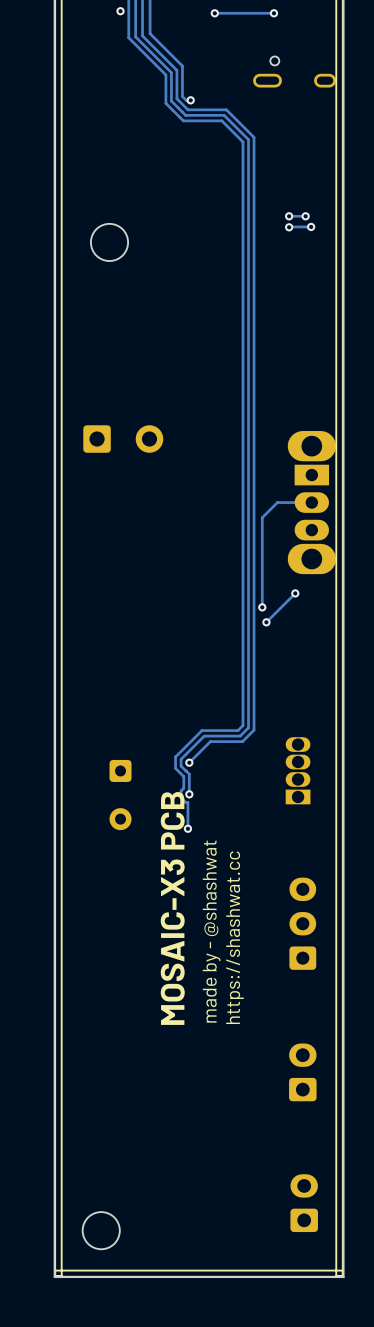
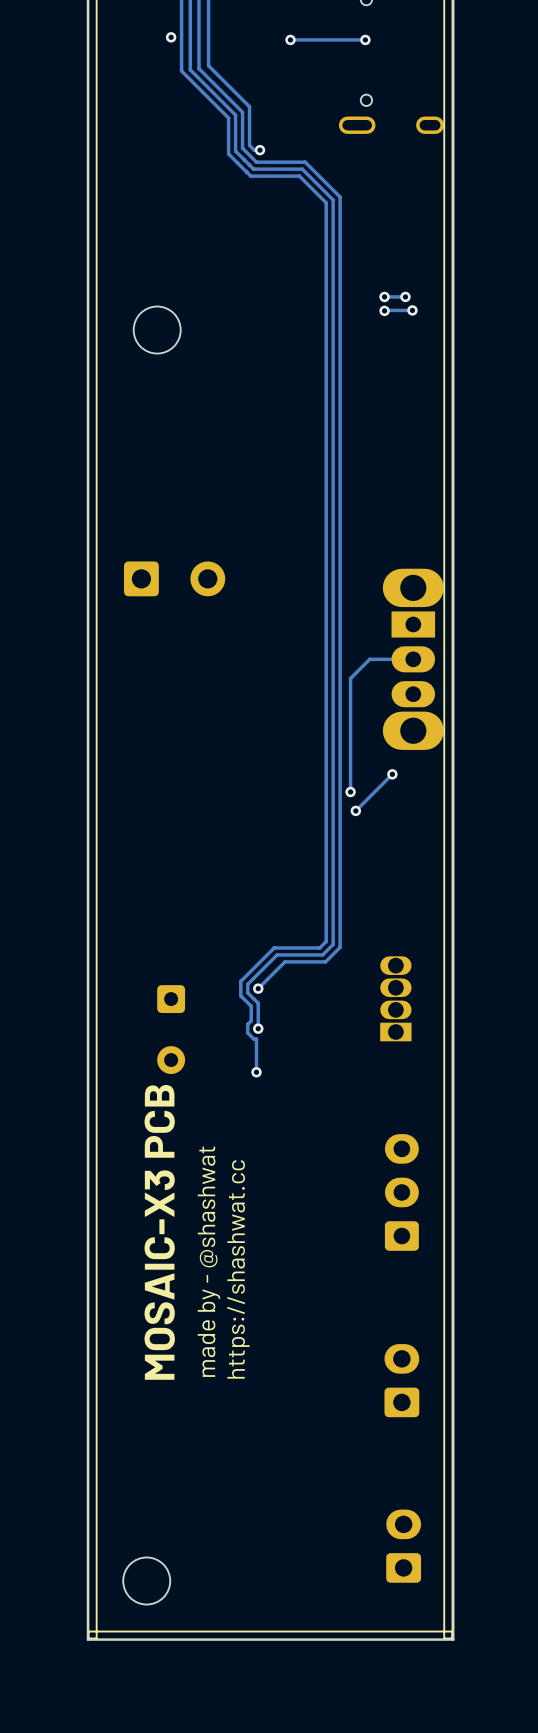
text position: MOSAIC-X3 PCB (172, 908) -> MOSAIC-X3 PCB (159, 1232)
text position: made by - @shashwat (211, 931) -> made by - @shashwat (208, 1261)
text position: https://shashwat.cc (234, 937) -> https://shashwat.cc (238, 1269)

